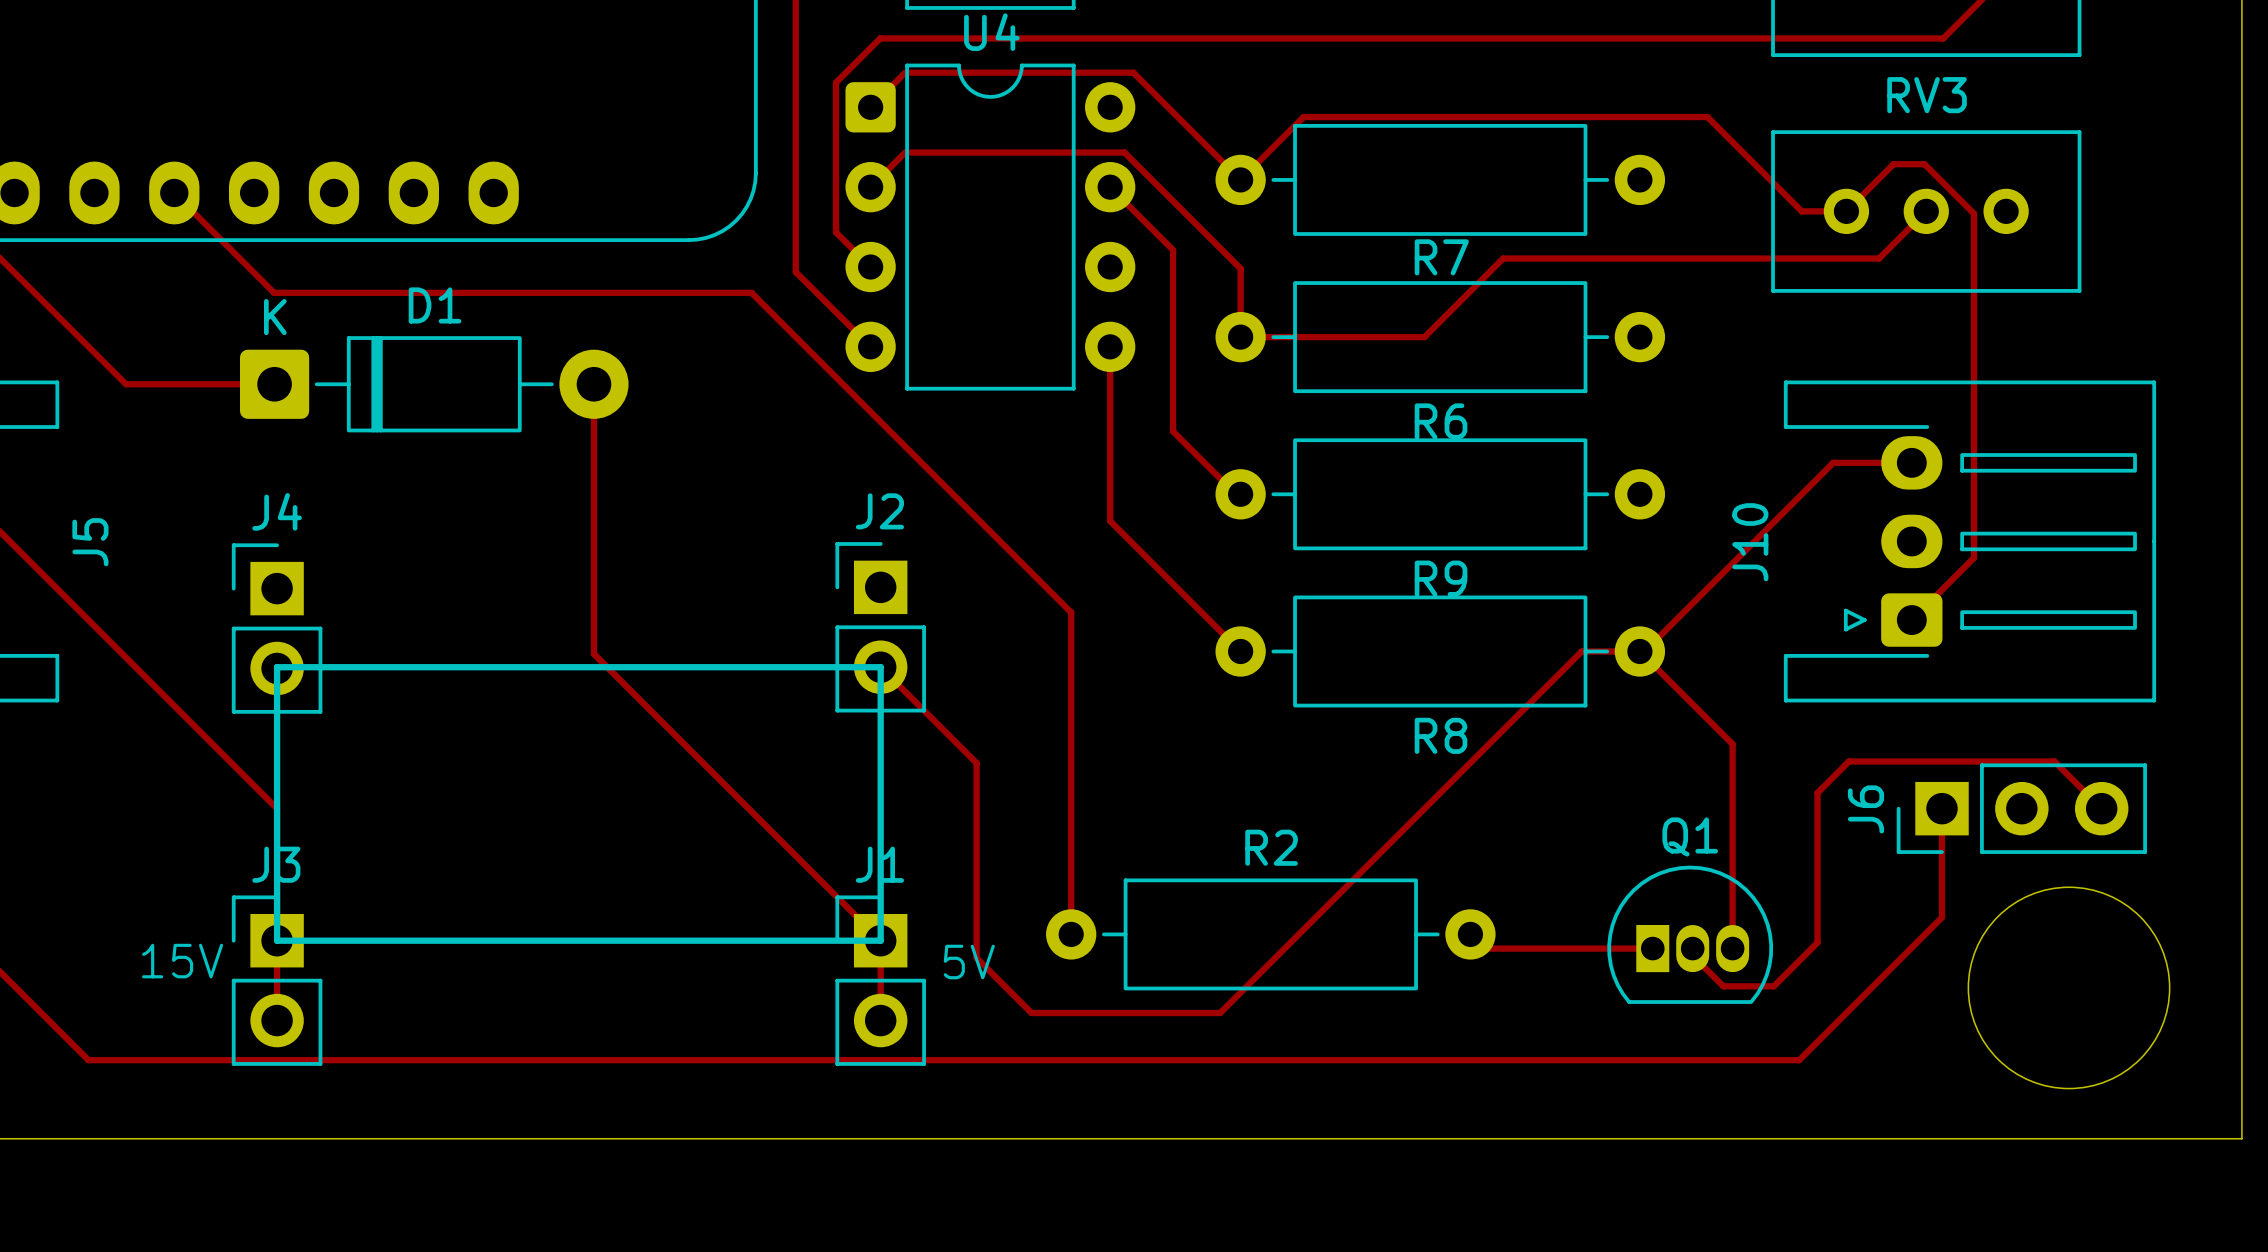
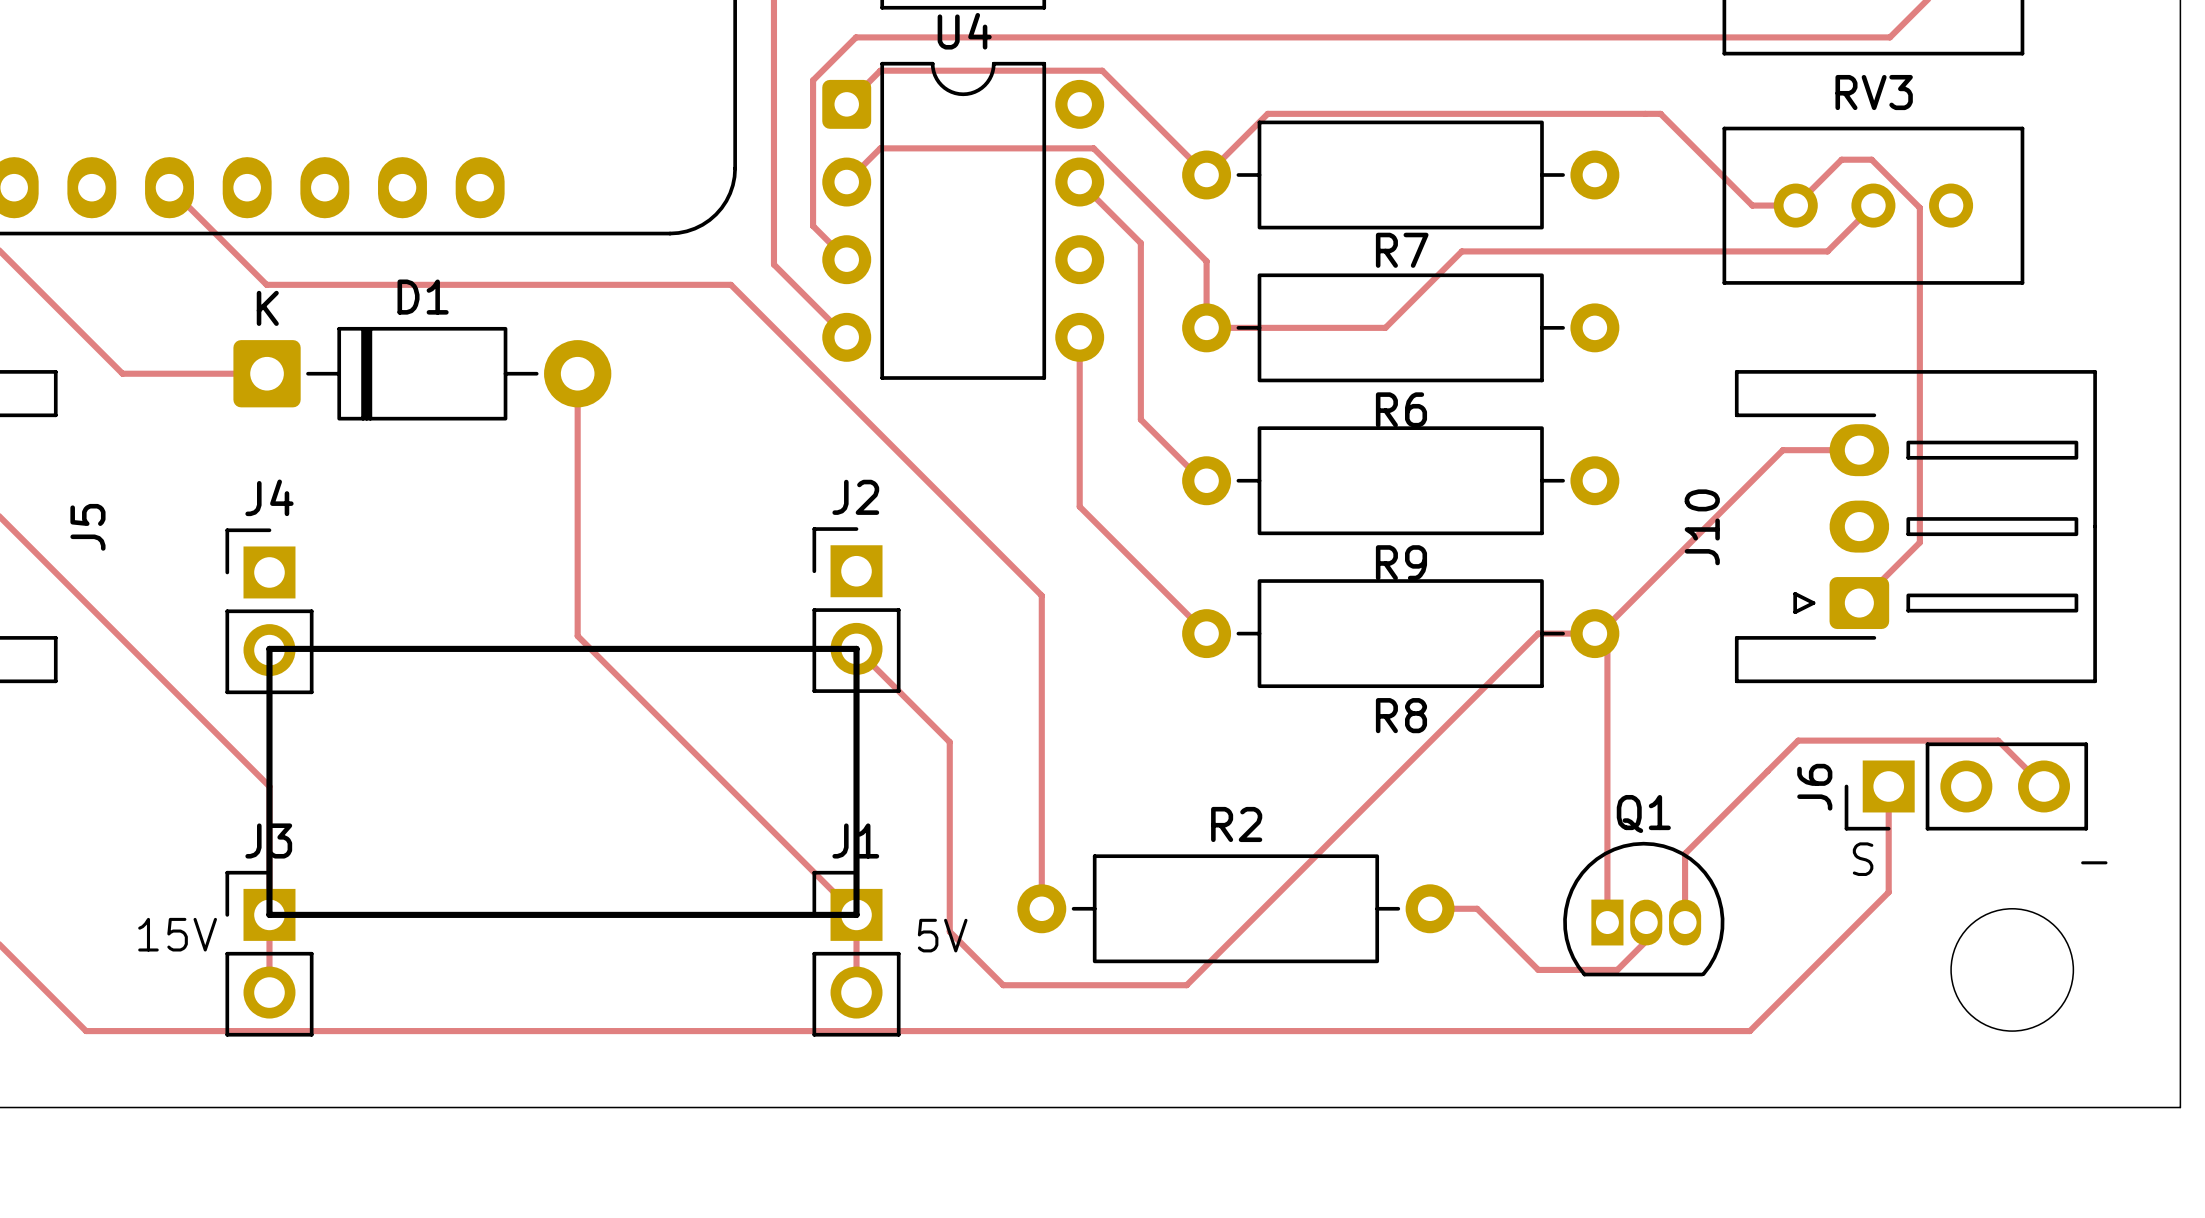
track: (1652, 664) (1732, 744) (1732, 877) -> (1607, 646) (1607, 922)
track: (1817, 792) (1817, 942) (1773, 986) (1723, 986) (1692, 955) -> (1767, 771) (1685, 853)
text: none -> S (1863, 859)
round board edge size: [1967, 886, 2171, 1090] -> [1950, 908, 2075, 1032]
text: none -> - (2094, 862)
track: none -> (1430, 908) (1477, 908) (1538, 969) (1617, 969) (1646, 941) (1646, 929)
track: (1484, 948) (1652, 948) -> none

